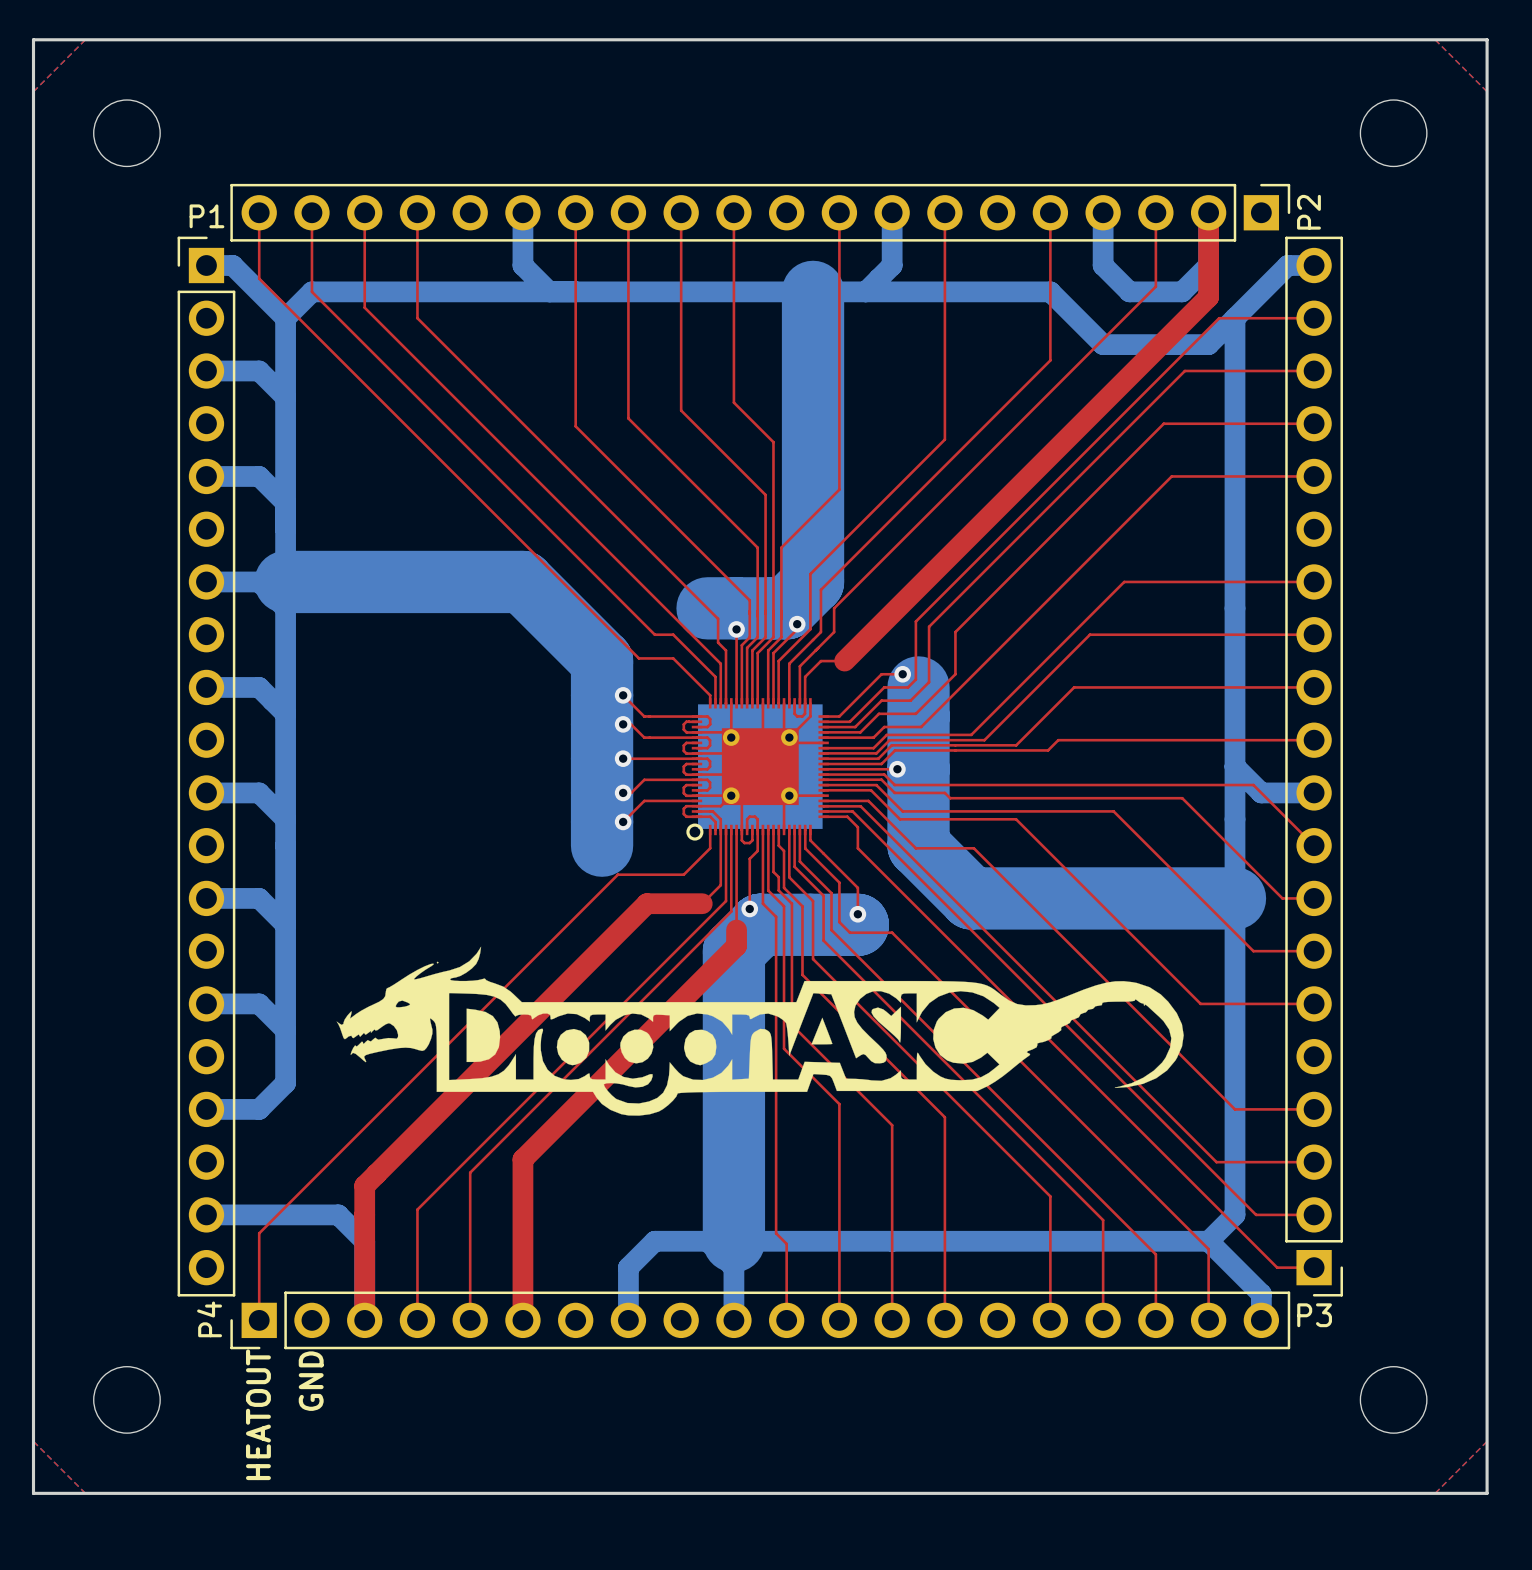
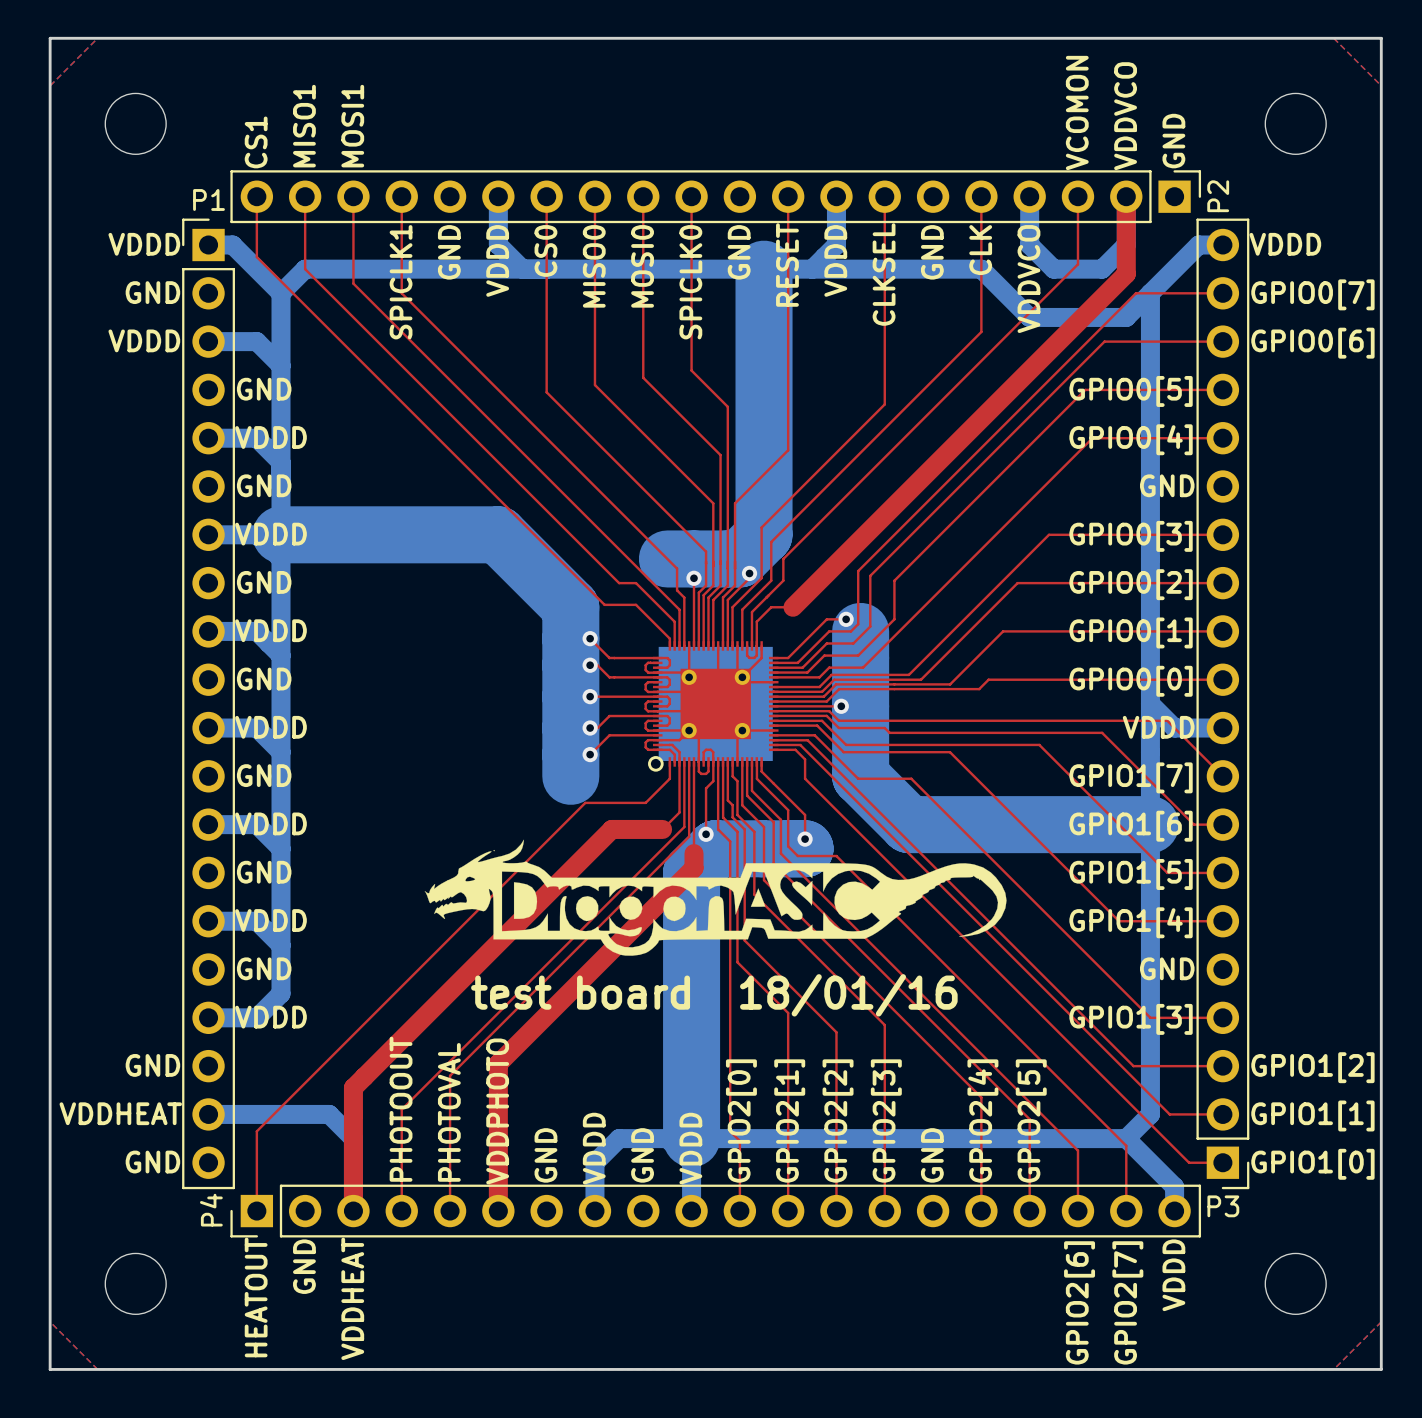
text: none -> VCOMON (1077, 113)
text: none -> VDDVCO (1125, 116)
text: none -> MISO1 (304, 126)
text: none -> MOSI1 (352, 126)
text: none -> GND (1173, 141)
text: none -> CS1 (256, 142)
text: none -> VDDD (144, 244)
text: none -> VDDD (1285, 244)
text: none -> CLK (980, 250)
text: none -> CS0 (545, 250)
text: none -> GND (449, 252)
text: none -> GND (739, 252)
text: none -> GND (932, 252)
text: none -> VDDD (497, 260)
text: none -> VDDD (835, 260)
text: none -> RESET (787, 265)
text: none -> MISO0 (594, 266)
text: none -> MOSI0 (642, 266)
text: none -> CLKSEL (884, 274)
text: none -> VDDVCO (1028, 279)
text: none -> SPICLK1 (401, 282)
text: none -> SPICLK0 (690, 282)
text: none -> GND (152, 292)
text: none -> GPIO0[7] (1312, 294)
text: none -> VDDD (144, 340)
text: none -> GPIO0[6] (1312, 343)
text: none -> GND (264, 389)
text: none -> GPIO0[5] (1131, 391)
text: none -> VDDD (270, 437)
text: none -> GPIO0[4] (1131, 439)
text: none -> GND (264, 485)
text: none -> GND (1167, 485)
text: none -> VDDD (270, 534)
text: none -> GPIO0[3] (1131, 536)
text: none -> GND (264, 582)
text: none -> GPIO0[2] (1131, 584)
text: none -> VDDD (270, 630)
text: none -> GPIO0[1] (1131, 632)
text: none -> GND (264, 679)
text: none -> GPIO0[0] (1131, 681)
text: none -> VDDD (270, 727)
text: none -> VDDD (1158, 727)
text: none -> GND (264, 775)
text: none -> GPIO1[7] (1131, 777)
text: none -> VDDD (270, 823)
text: none -> GPIO1[6] (1131, 826)
drawing: none -> [424, 839, 1007, 956]
drawing: [336, 946, 1184, 1116] -> none
text: none -> GND (264, 872)
text: none -> GPIO1[5] (1131, 874)
text: none -> VDDD (270, 920)
text: none -> GPIO1[4] (1131, 922)
text: none -> GND (264, 968)
text: none -> GND (1167, 968)
text: none -> test board 18/01/16 (714, 995)
text: none -> VDDD (270, 1017)
text: none -> GPIO1[3] (1131, 1019)
text: none -> GND (152, 1065)
text: none -> GPIO1[2] (1312, 1067)
text: none -> PHOTOOUT (401, 1109)
text: none -> VDDPHOTO (497, 1111)
text: none -> PHOTOVAL (449, 1112)
text: none -> VDDHEAT (120, 1113)
text: none -> GPIO1[1] (1312, 1115)
text: none -> GPIO2[0] (741, 1121)
text: none -> GPIO2[1] (789, 1121)
text: none -> GPIO2[2] (838, 1121)
text: none -> GPIO2[3] (886, 1121)
text: none -> GPIO2[4] (982, 1121)
text: none -> GPIO2[5] (1031, 1121)
text: none -> VDDD (594, 1148)
text: none -> VDDD (690, 1148)
text: none -> GND (545, 1155)
text: none -> GND (642, 1155)
text: none -> GND (932, 1155)
text: none -> GND (152, 1162)
text: none -> GPIO1[0] (1312, 1164)
text: none -> VDDD (1173, 1275)
text: none -> VDDHEAT (352, 1298)
text: none -> GPIO2[6] (1079, 1302)
text: none -> GPIO2[7] (1127, 1302)

